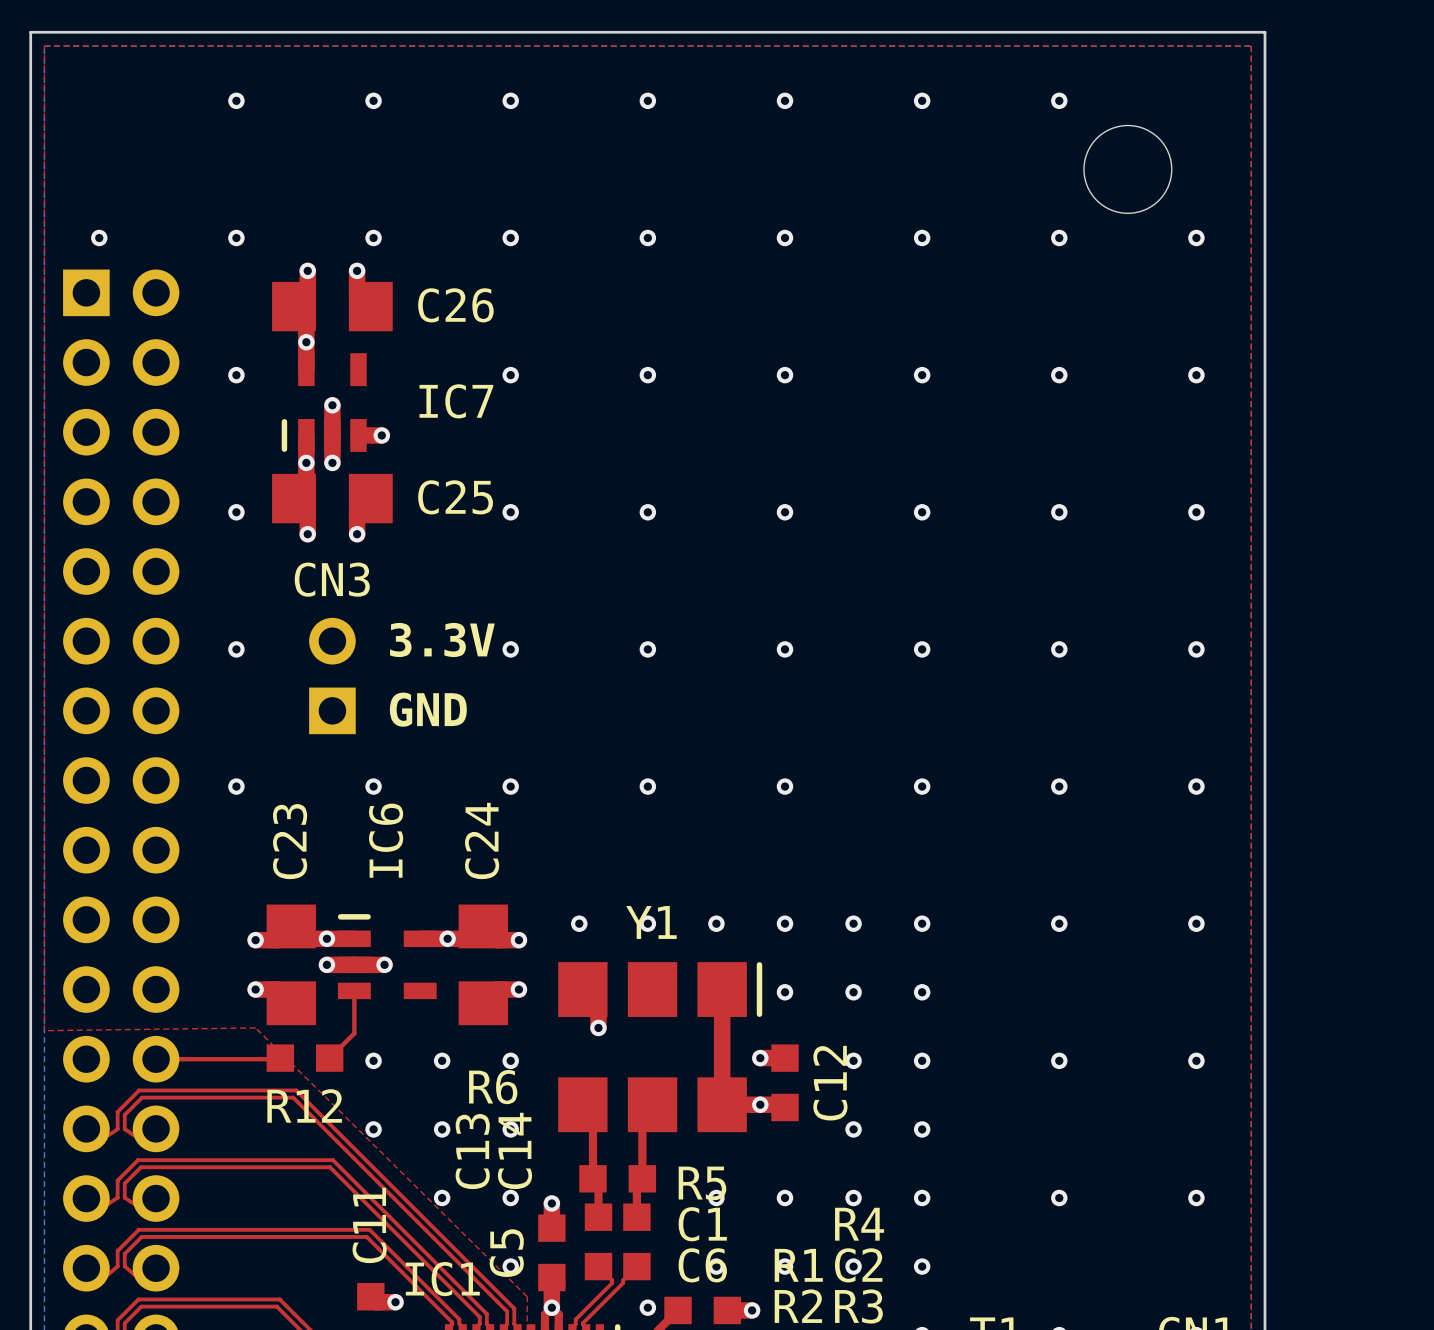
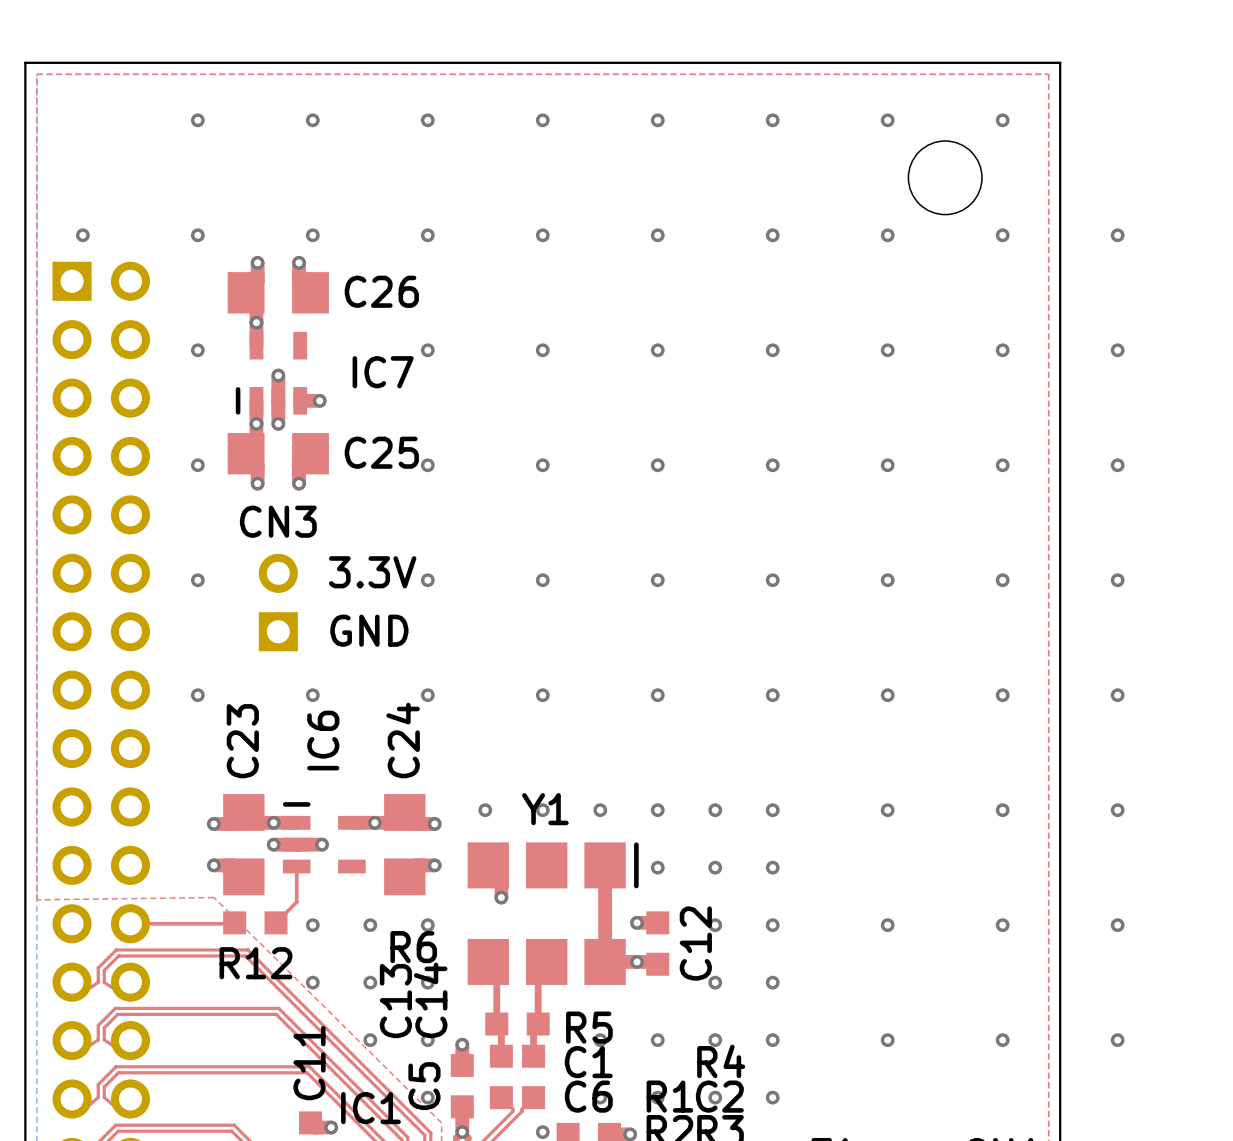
via: none -> (1002, 120)
via: none -> (1117, 235)
via: none -> (1117, 350)
via: none -> (1117, 465)
via: none -> (1117, 580)
via: none -> (1117, 695)
via: none -> (1117, 810)
via: none -> (1117, 925)
via: none -> (1117, 1040)

